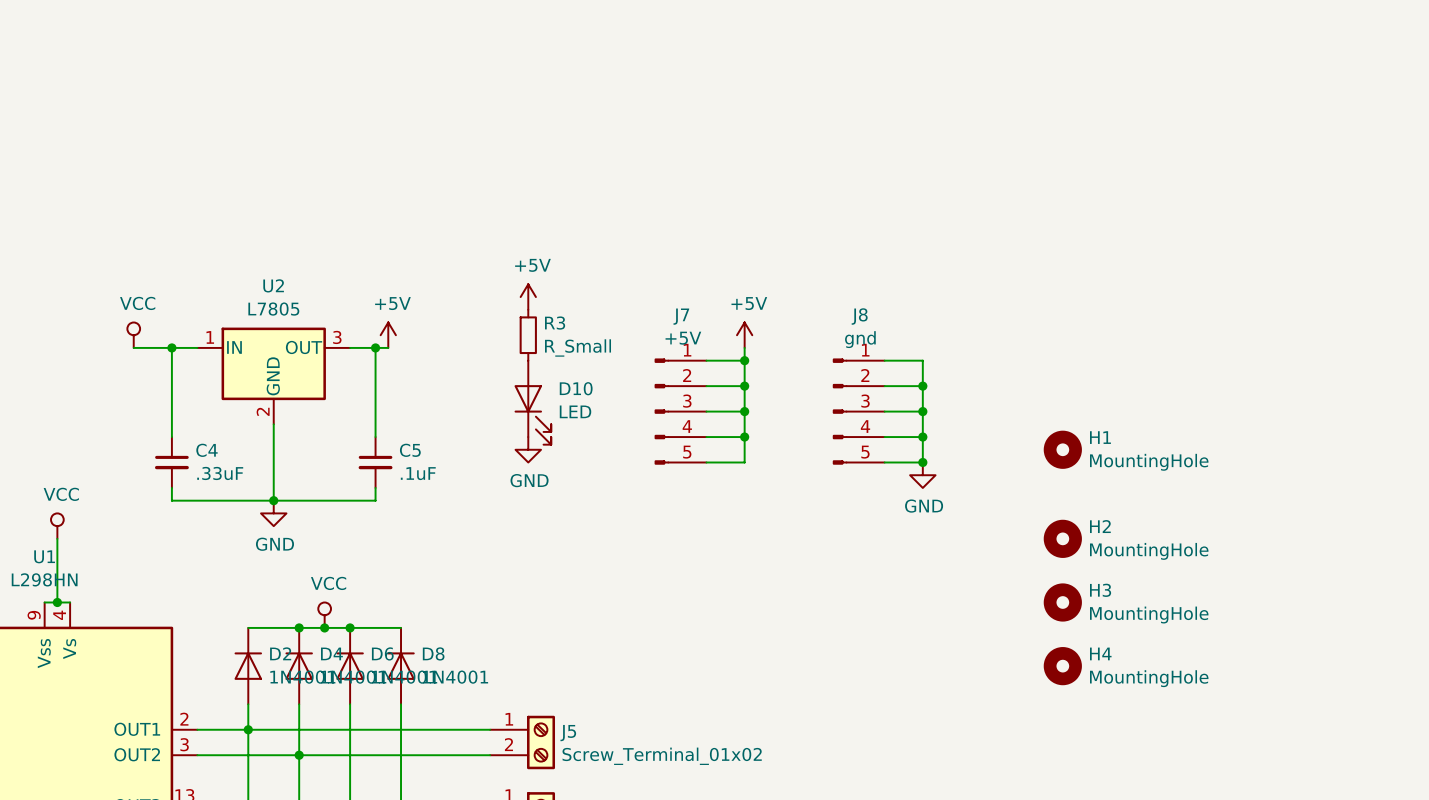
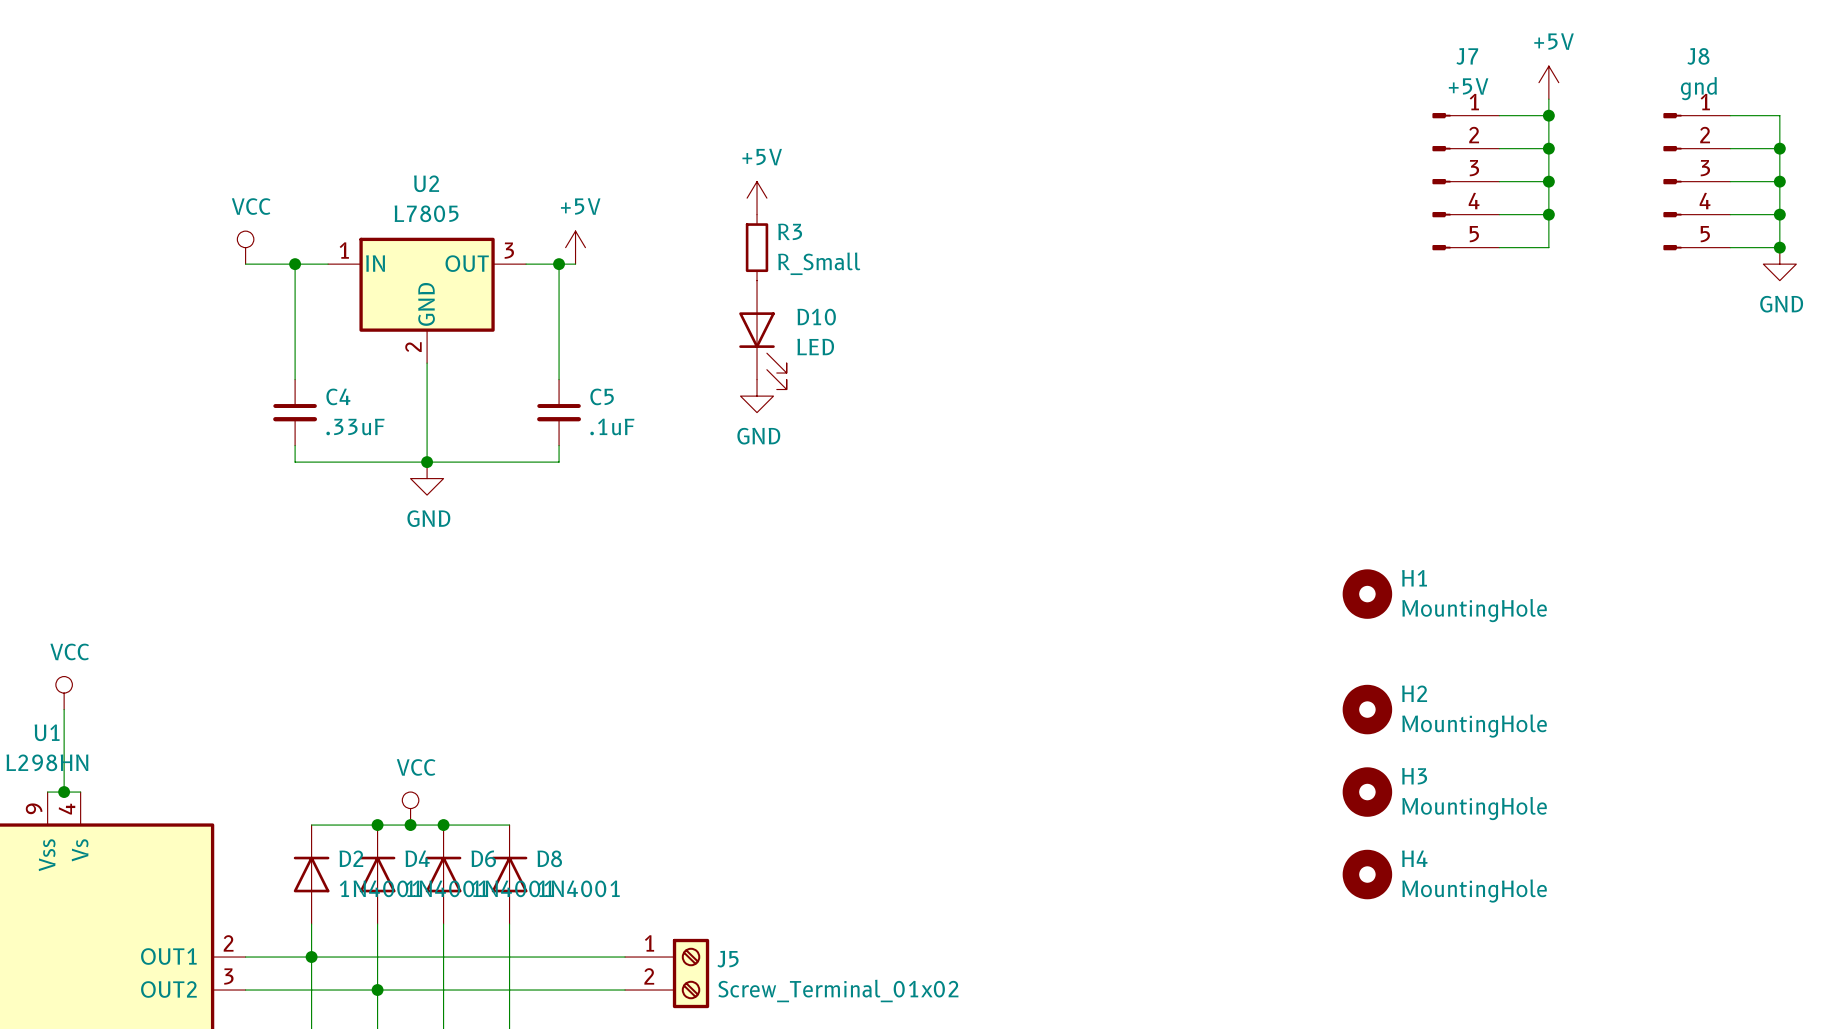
power symbol: none -> +5V (1548, 82)
wire: none -> (1548, 99) (1548, 247) (1499, 247)
wire: none -> (1499, 115) (1548, 115)
junction: none -> (1548, 115)
wire: none -> (1730, 115) (1779, 115) (1779, 247) (1730, 247)
wire: none -> (1499, 148) (1548, 148)
junction: none -> (1548, 148)
wire: none -> (1730, 148) (1779, 148)
junction: none -> (1779, 148)
wire: none -> (1499, 181) (1548, 181)
junction: none -> (1548, 181)
wire: none -> (1730, 181) (1779, 181)
junction: none -> (1779, 181)
power symbol: none -> +5V (757, 198)
wire: none -> (1499, 214) (1548, 214)
junction: none -> (1548, 214)
wire: none -> (1730, 214) (1779, 214)
junction: none -> (1779, 214)
power symbol: none -> +5V (575, 247)
junction: none -> (1779, 247)
junction: none -> (295, 264)
wire: none -> (526, 264) (575, 264)
junction: none -> (559, 264)
power symbol: none -> GND (1779, 264)
power symbol: +5V (528, 297) -> none
power symbol: none -> GND (757, 396)
power symbol position: VCC (133, 335) -> VCC (245, 247)
power symbol: +5V (388, 335) -> none
wire: none -> (559, 445) (559, 462) (493, 462)
R3 position: (528, 335) -> (757, 247)
power symbol: +5V (744, 335) -> none
wire: (133, 347) (197, 347) -> (245, 264) (328, 264)
wire: (171, 347) (171, 437) -> (295, 264) (295, 379)
junction: (171, 347) -> none
wire: (375, 347) (375, 437) -> (559, 264) (559, 379)
junction position: (375, 347) -> (427, 462)
wire: (744, 347) (744, 462) (706, 462) -> none
power symbol: none -> GND (427, 478)
wire: (706, 360) (744, 360) -> none
junction: (744, 360) -> none
wire: (884, 360) (922, 360) (922, 462) (884, 462) -> none
U2 position: (273, 375) -> (427, 300)
wire: (706, 386) (744, 386) -> none
junction: (744, 386) -> none
wire: (884, 386) (922, 386) -> none
junction: (922, 386) -> none
D10 position: (532, 402) -> (762, 335)
J7 position: (680, 411) -> (1465, 181)
wire: (706, 411) (744, 411) -> none
junction: (744, 411) -> none
J8 position: (858, 411) -> (1696, 181)
wire: (884, 411) (922, 411) -> none
junction: (922, 411) -> none
wire: (273, 424) (273, 500) -> (427, 363) (427, 462)
wire: (706, 437) (744, 437) -> none
junction: (744, 437) -> none
wire: (884, 437) (922, 437) -> none
junction: (922, 437) -> none
power symbol: GND (528, 449) -> none
C4 position: (171, 462) -> (295, 412)
C5 position: (375, 462) -> (559, 412)
junction: (922, 462) -> none
power symbol: GND (922, 475) -> none
wire: (171, 487) (171, 500) (375, 500) (375, 487) -> none
junction: (273, 500) -> none
power symbol: GND (273, 513) -> none

